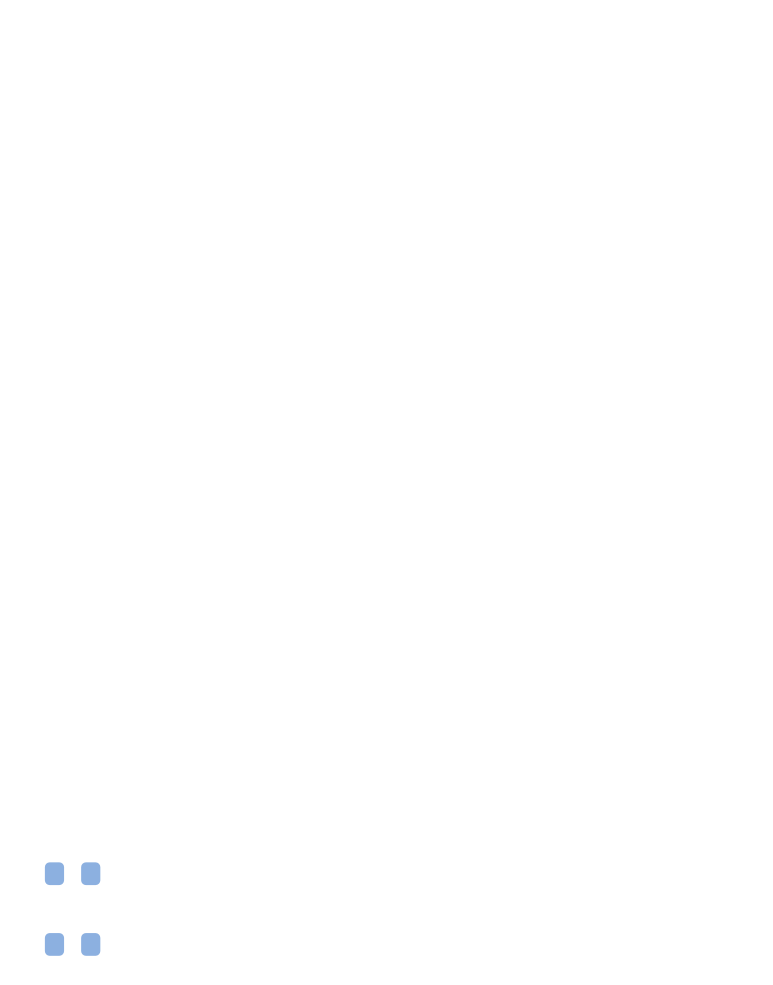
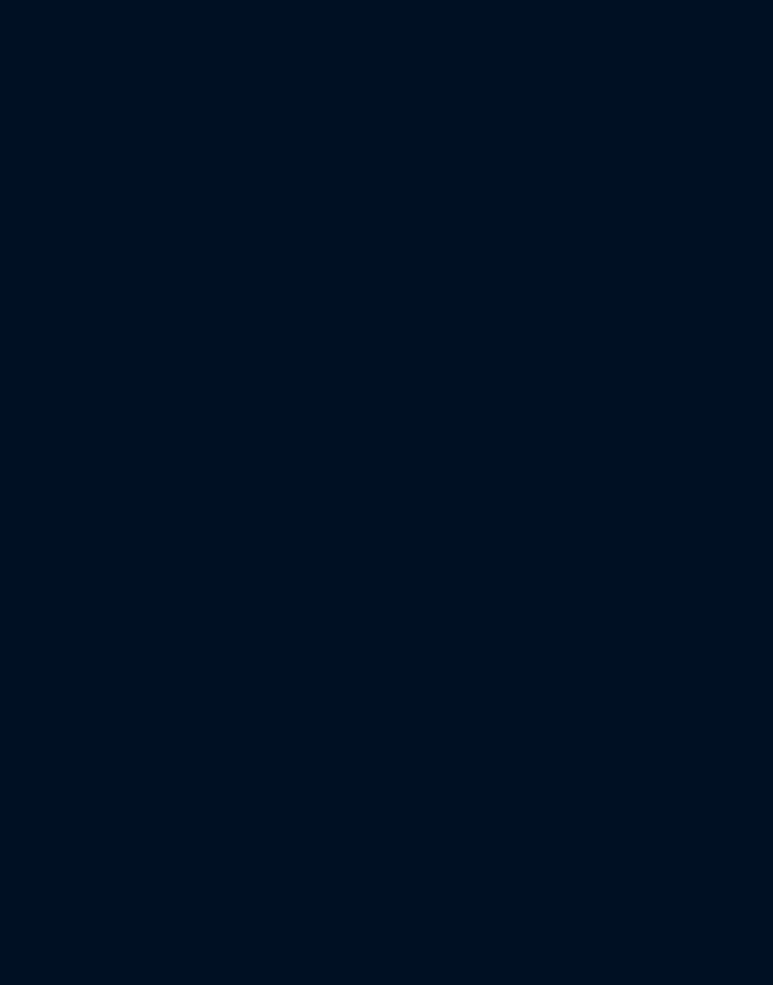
part: (72, 873) -> none
part: (72, 944) -> none

